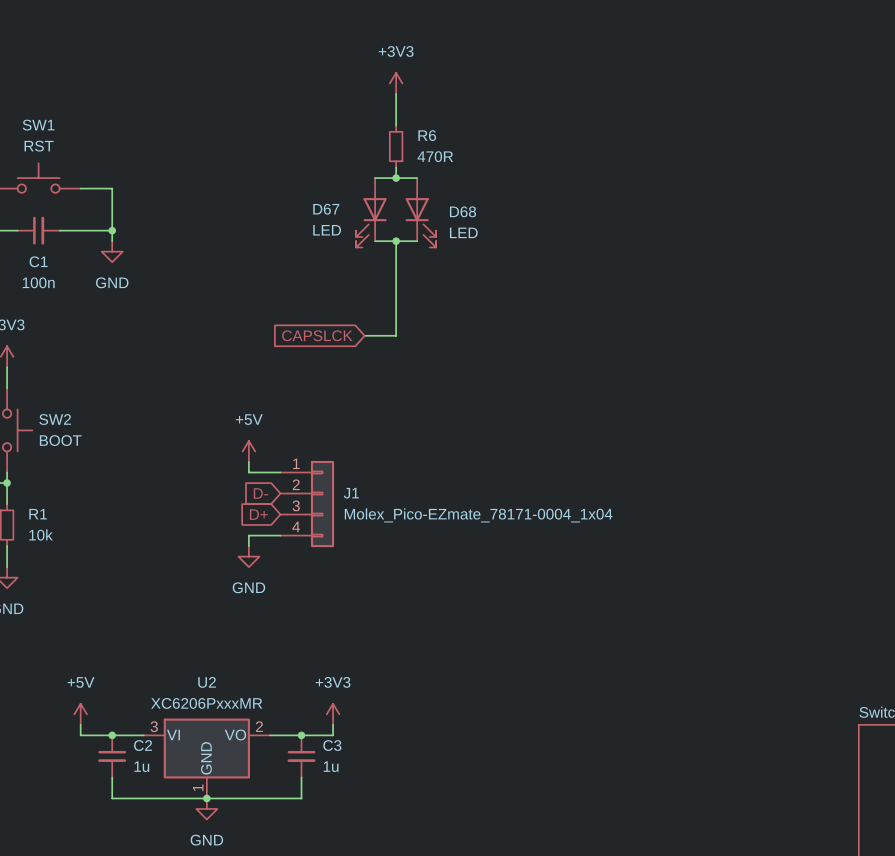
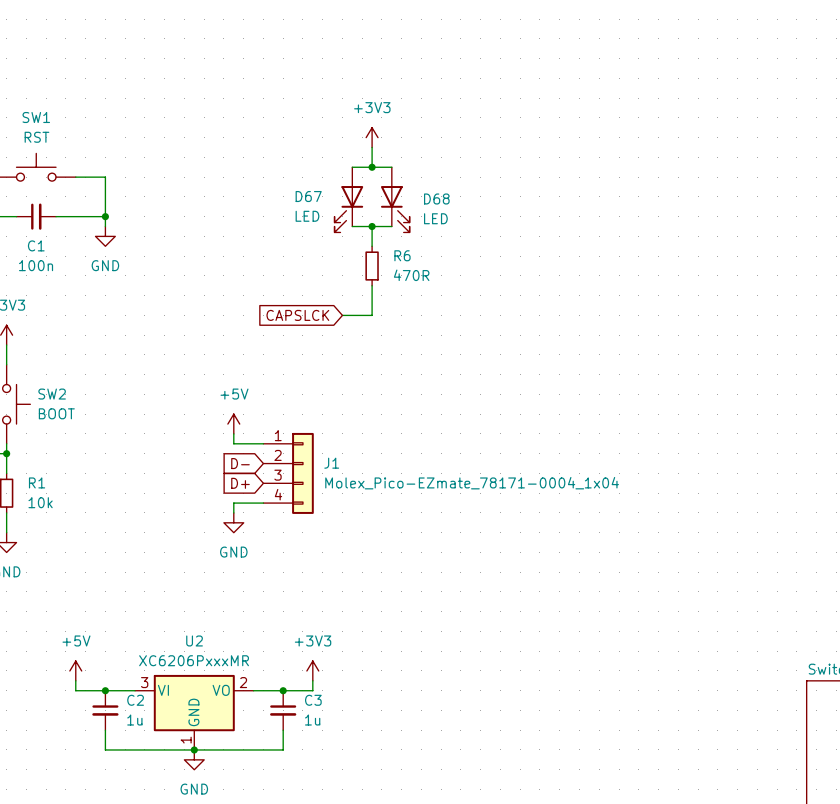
power symbol position: +3V3 (396, 83) -> +3V3 (372, 137)
wire: (396, 93) (396, 125) -> none
R6 position: (396, 146) -> (372, 266)
wire: (396, 262) (396, 304) -> none

